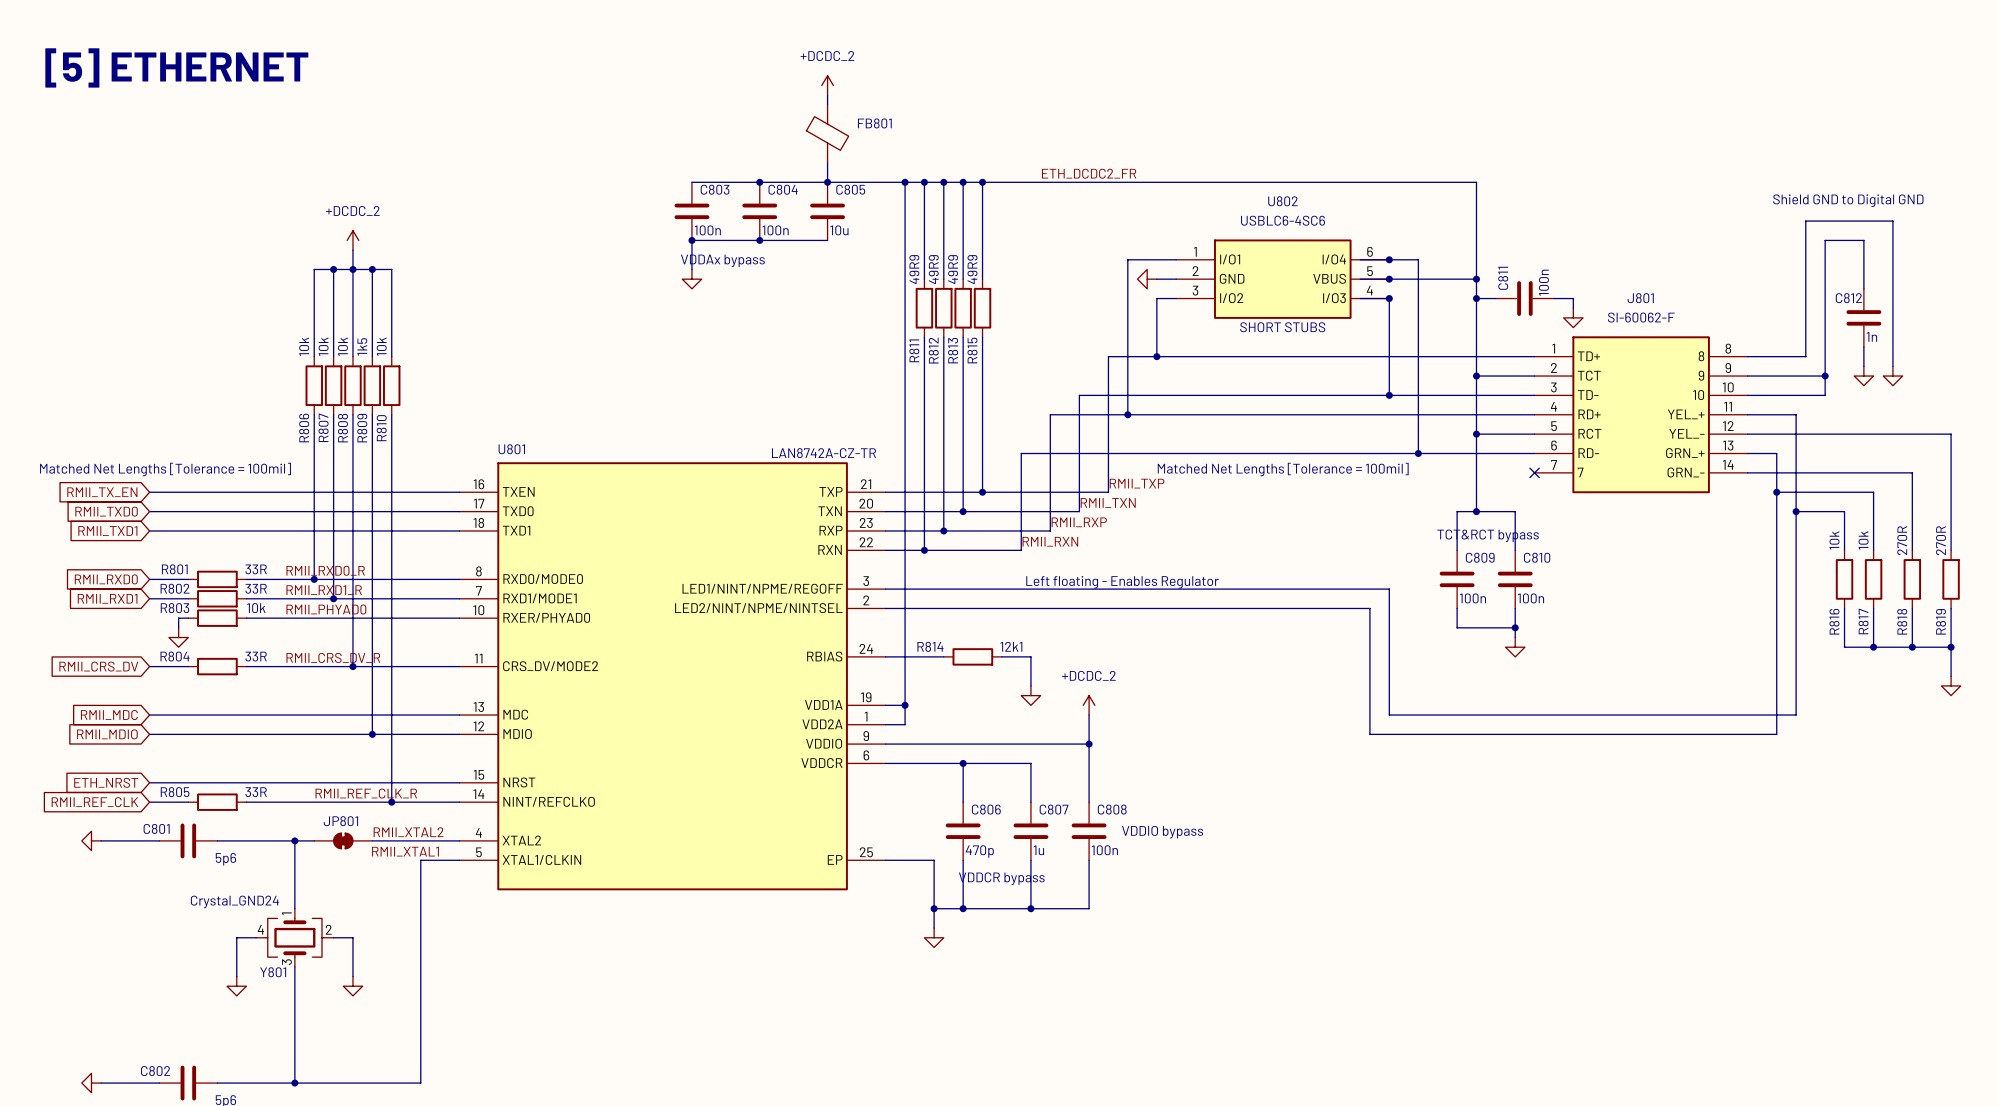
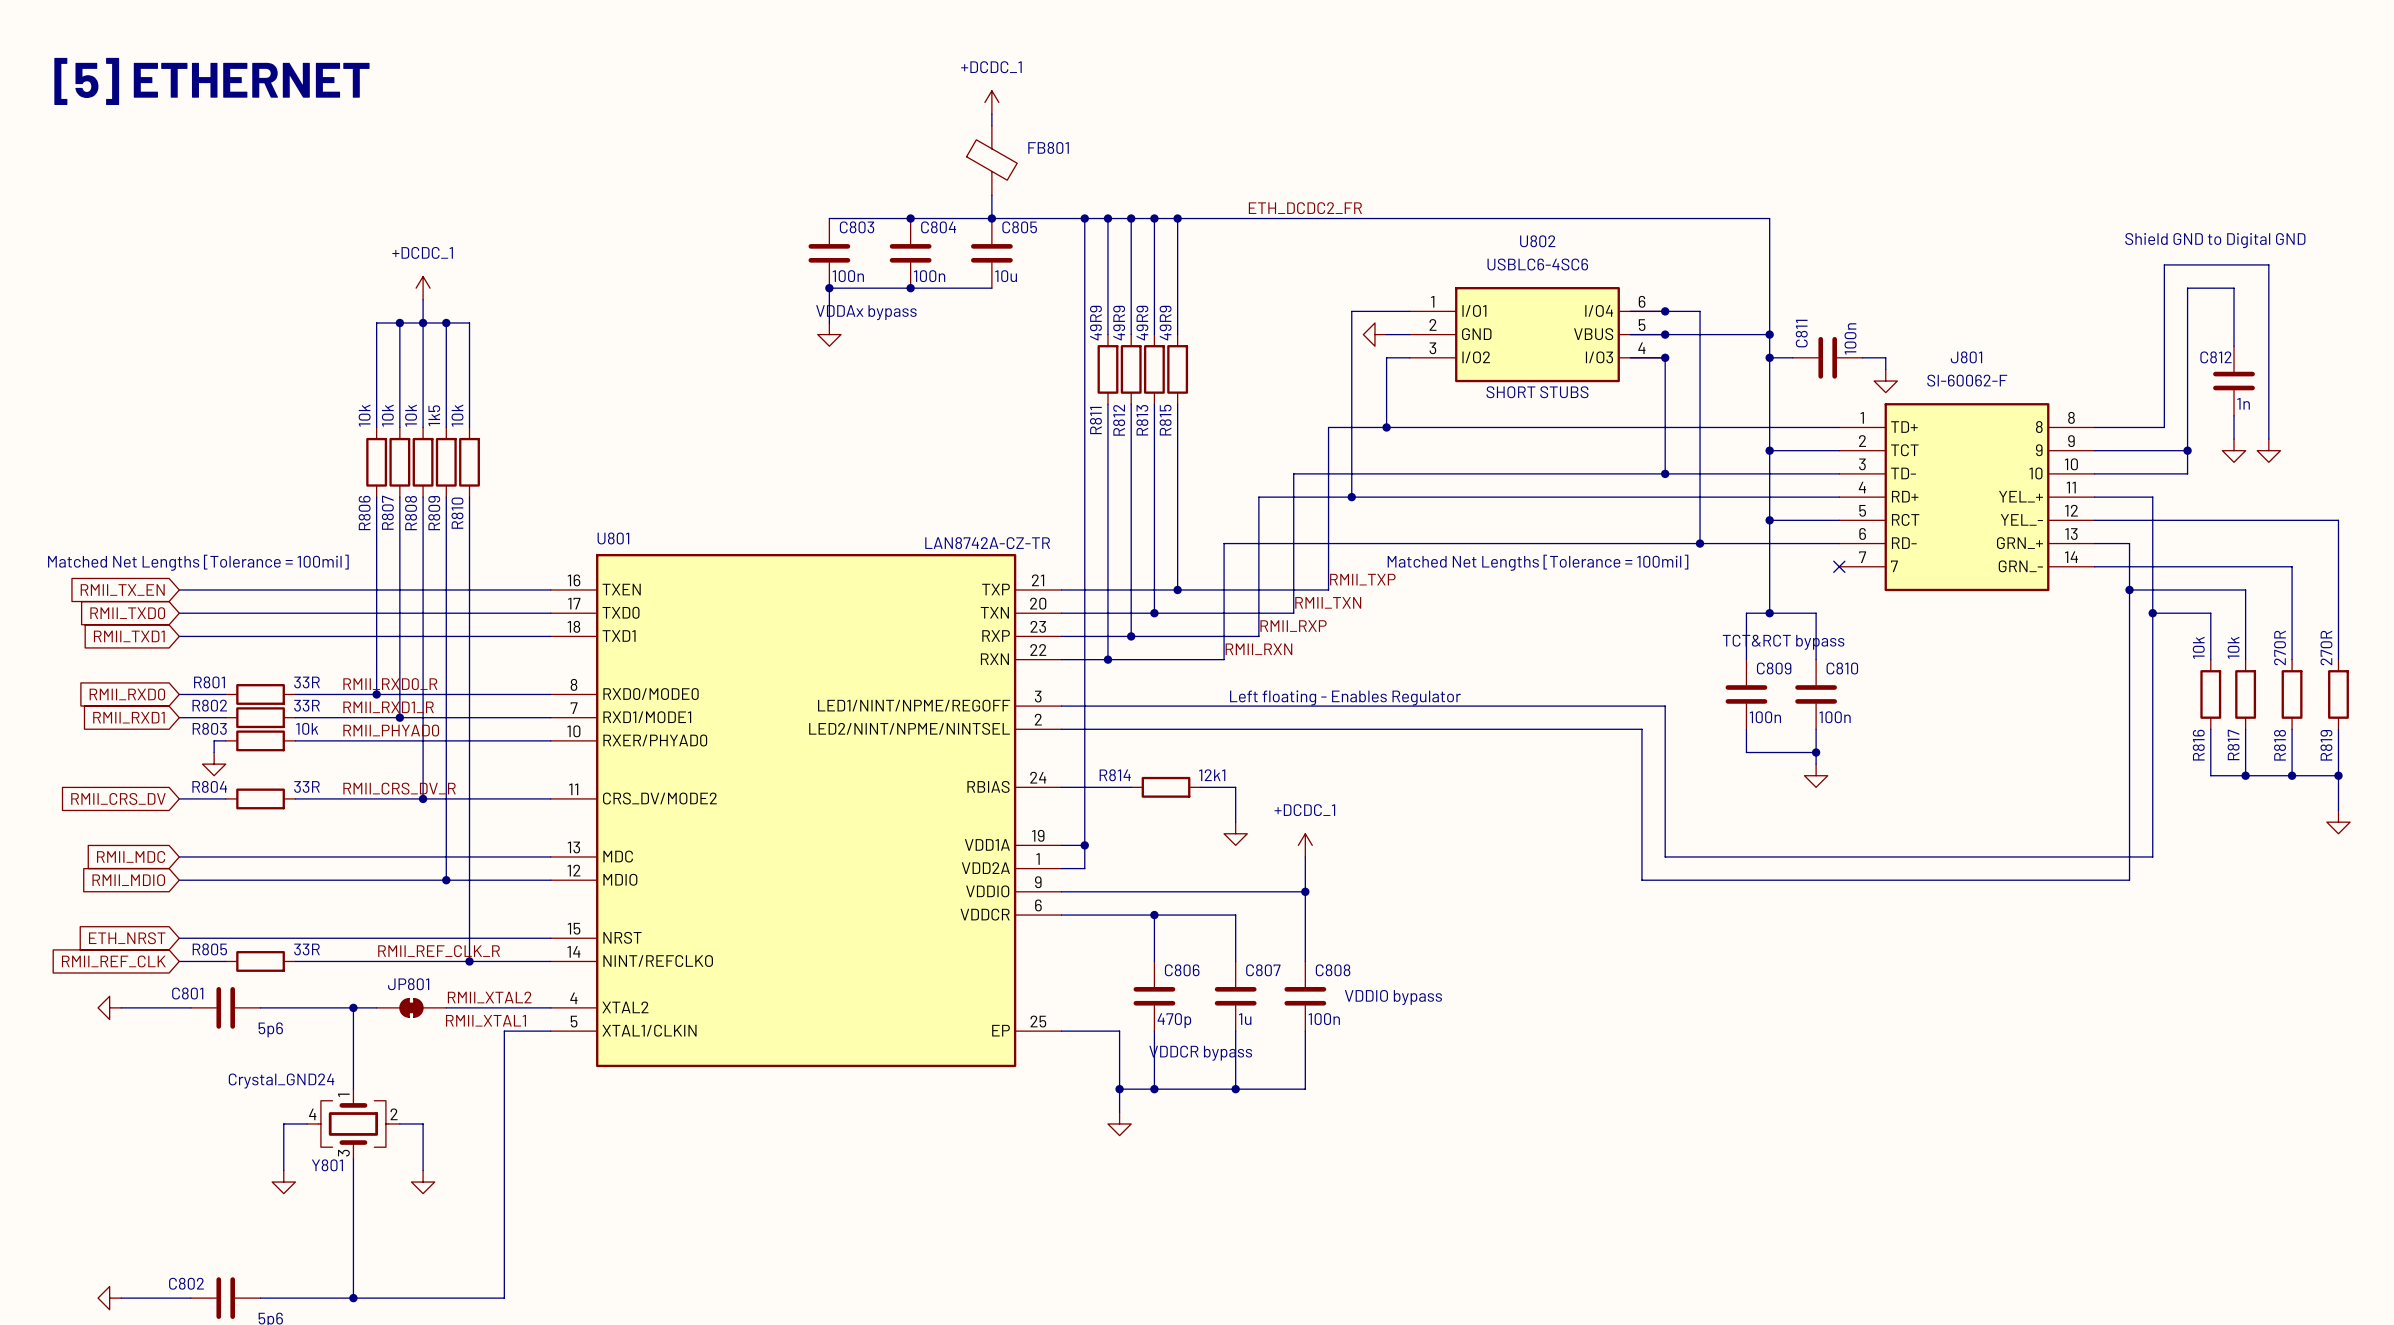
power symbol: +DCDC_2 (827, 85) -> +DCDC_1 (991, 102)
power symbol: +DCDC_2 (352, 240) -> +DCDC_1 (423, 288)
power symbol: +DCDC_2 (1089, 705) -> +DCDC_1 (1305, 845)

